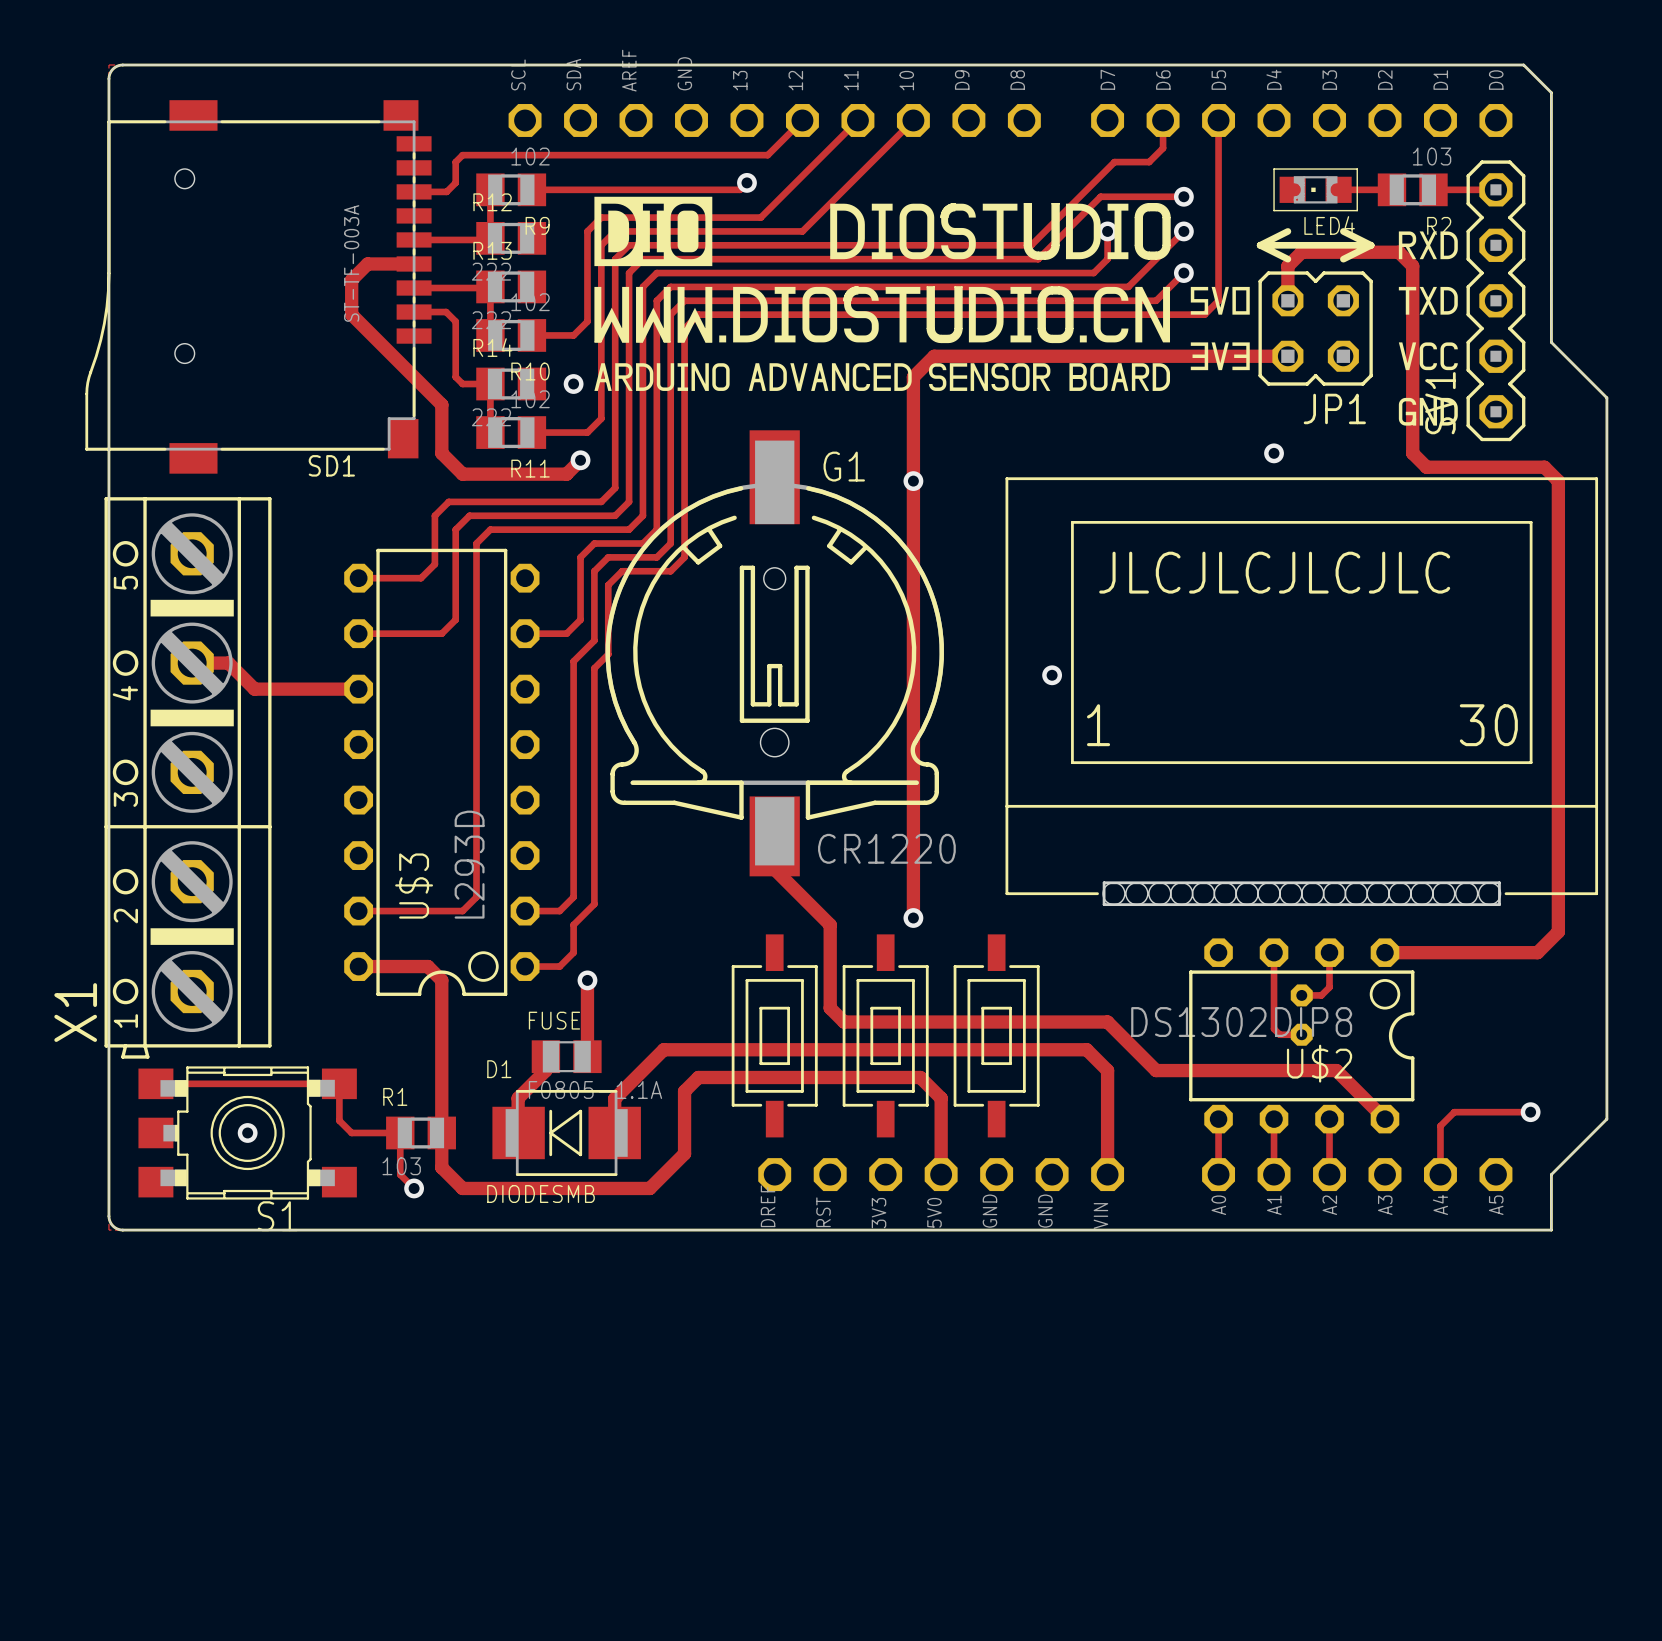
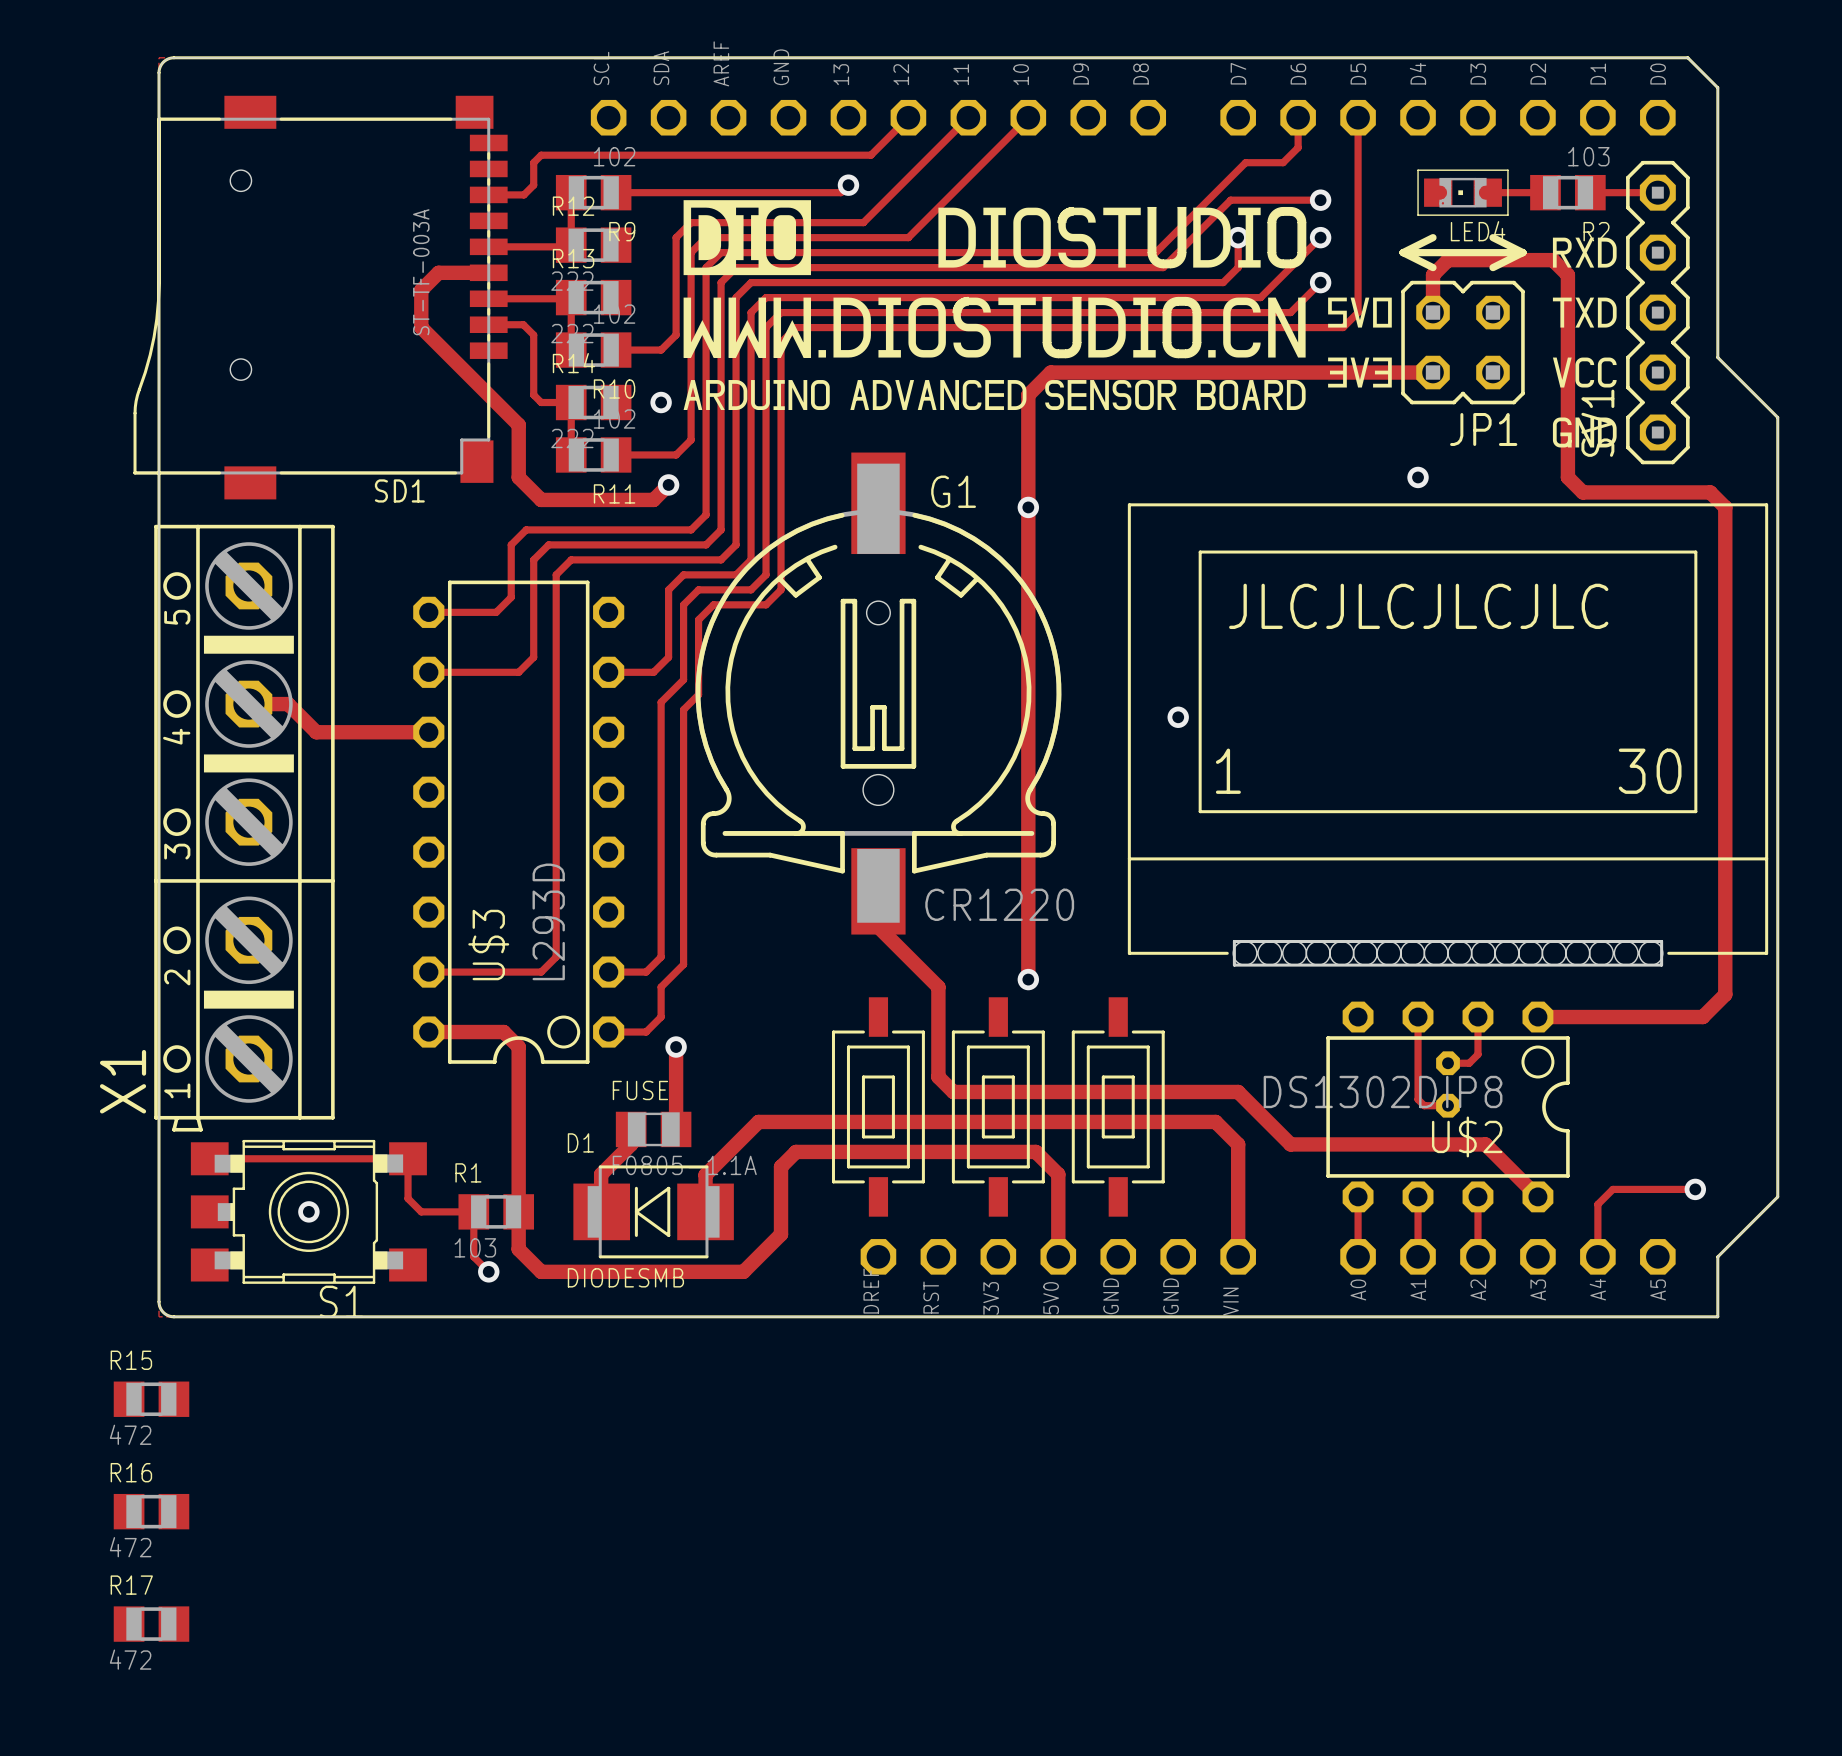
R15: none -> 472 (151, 1399)
R16: none -> 472 (151, 1511)
R17: none -> 472 (151, 1624)

